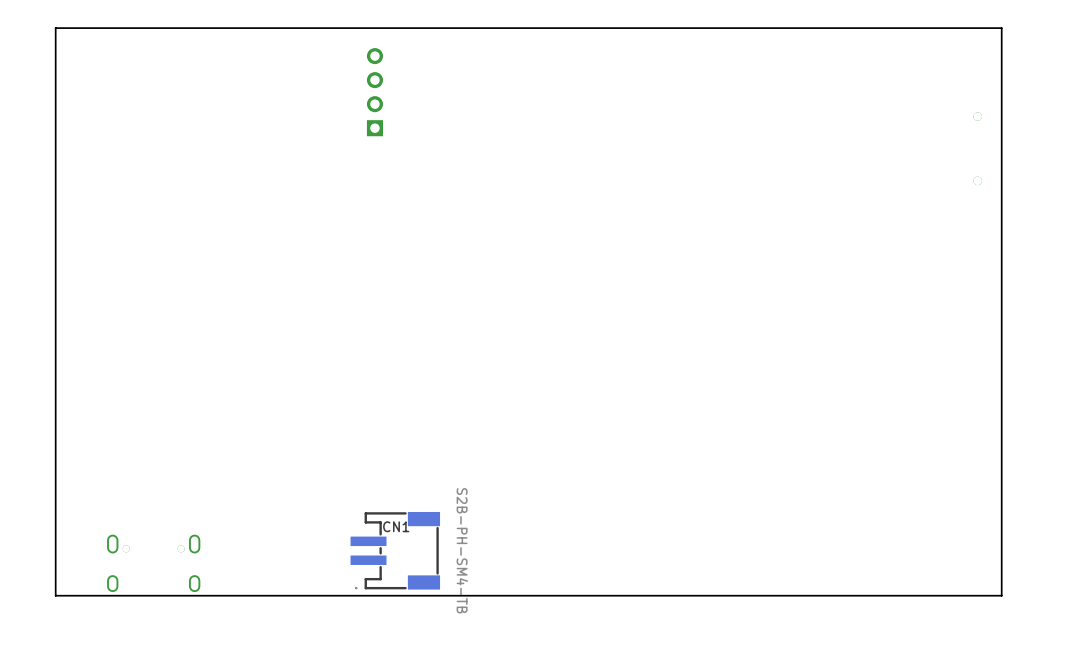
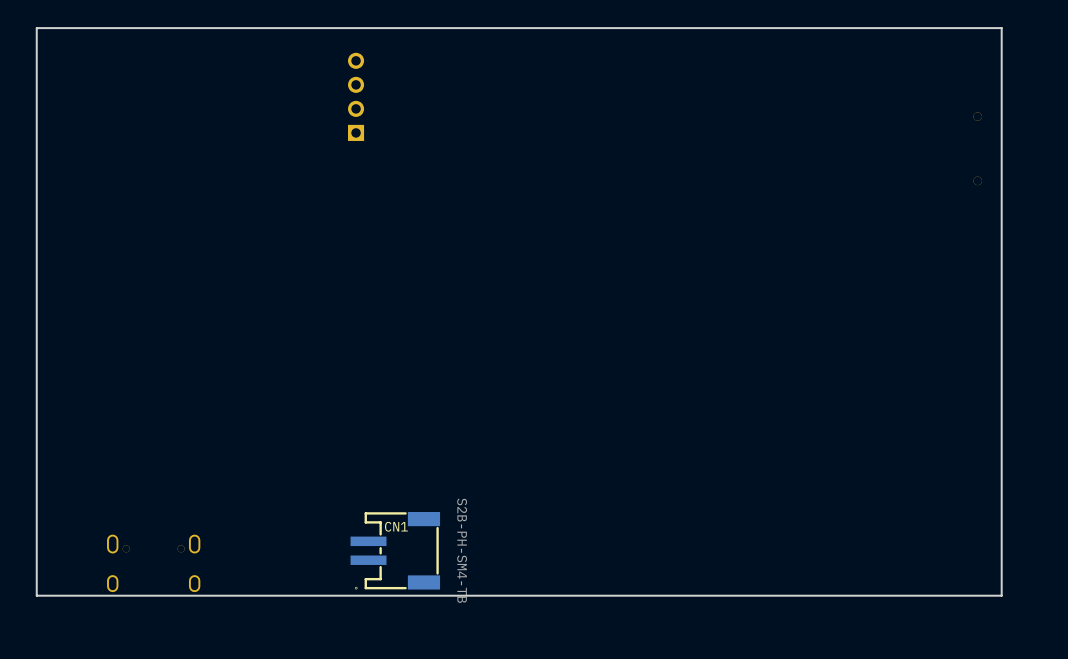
board edge: (55, 28) (55, 595) -> (55, 28) (36, 28) (36, 595) (55, 595)
part position: (374, 92) -> (356, 96)

